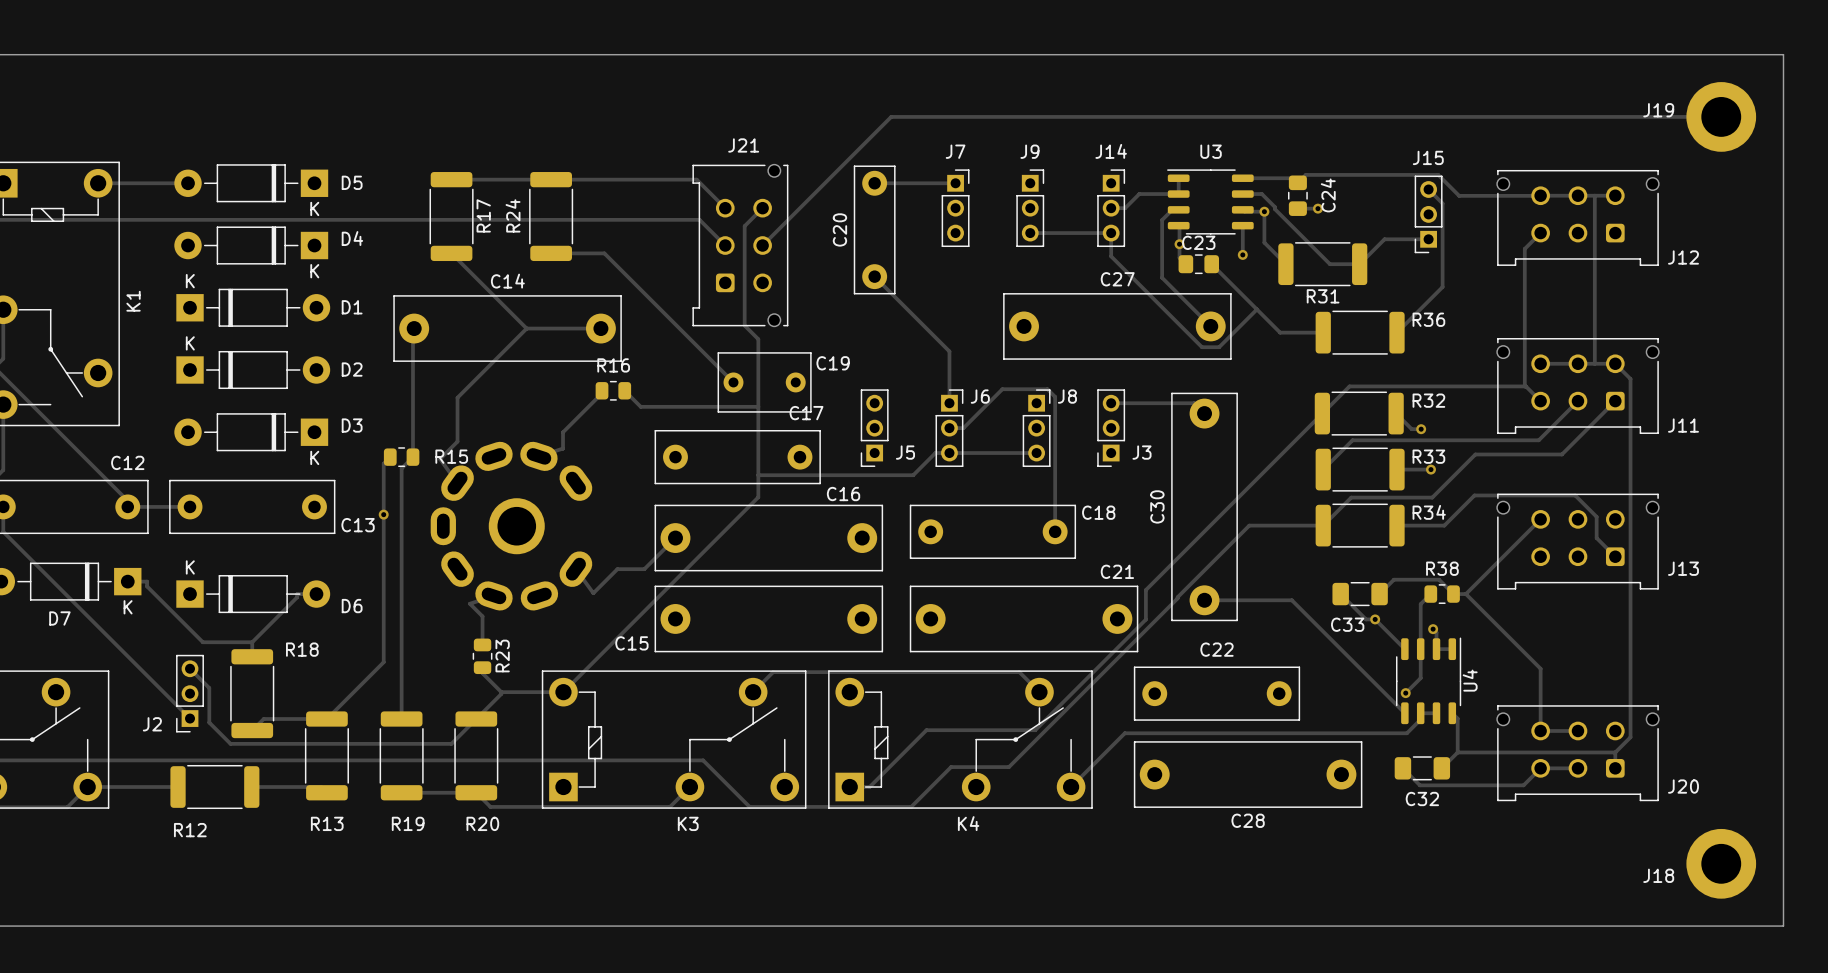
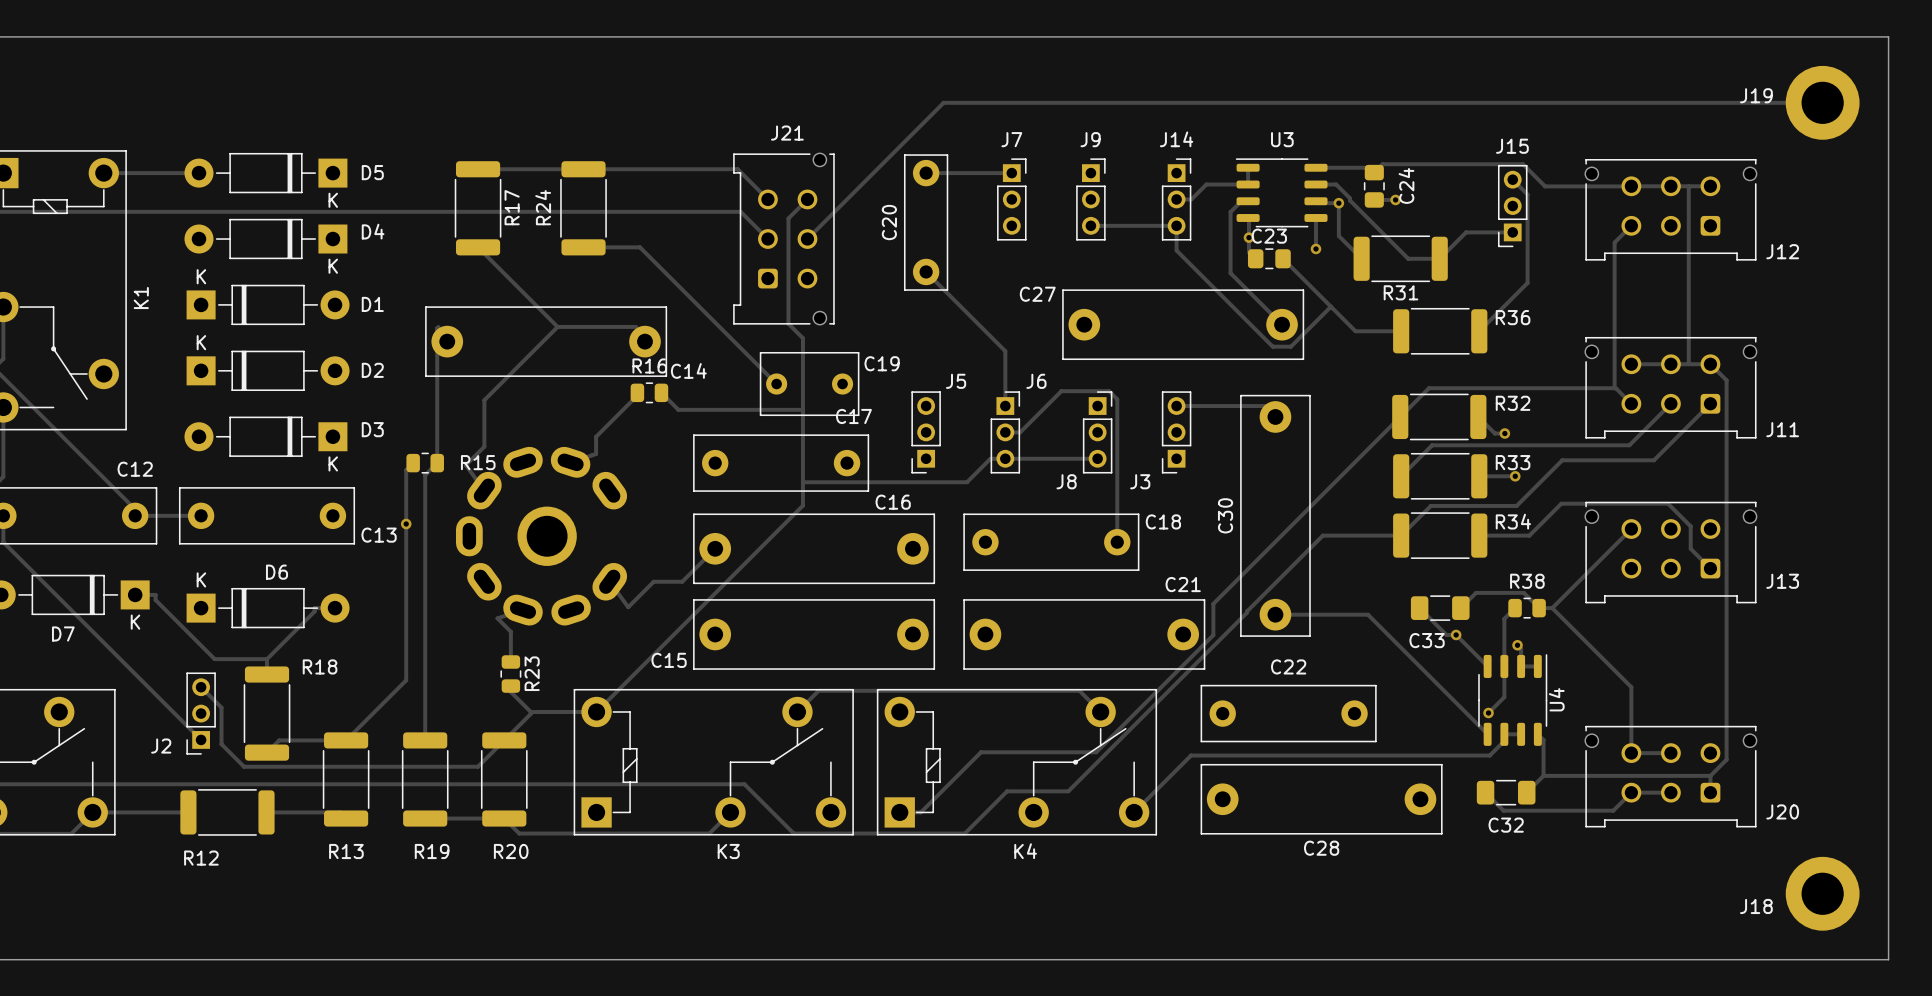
C27 name position: C27 (1117, 279) -> C27 (1037, 294)
C14 name position: C14 (507, 281) -> C14 (688, 370)
C14 position: (507, 328) -> (546, 341)
J6 name position: J6 (980, 396) -> J6 (1036, 381)
J8 name position: J8 (1067, 396) -> J8 (1066, 481)
J5 name position: J5 (905, 452) -> J5 (956, 381)
J3 name position: J3 (1141, 452) -> J3 (1140, 481)
D6 name position: D6 (352, 606) -> D6 (277, 572)

